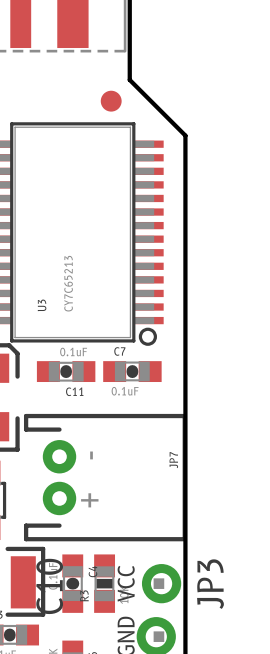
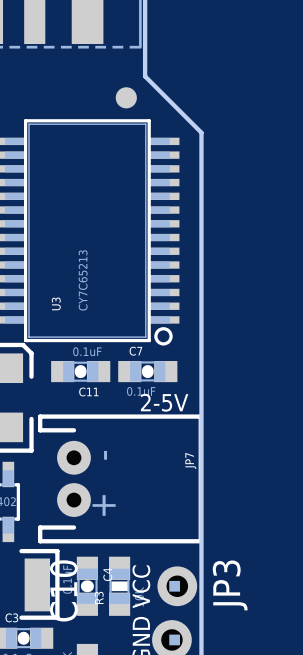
text: none -> 2-5V (164, 402)

